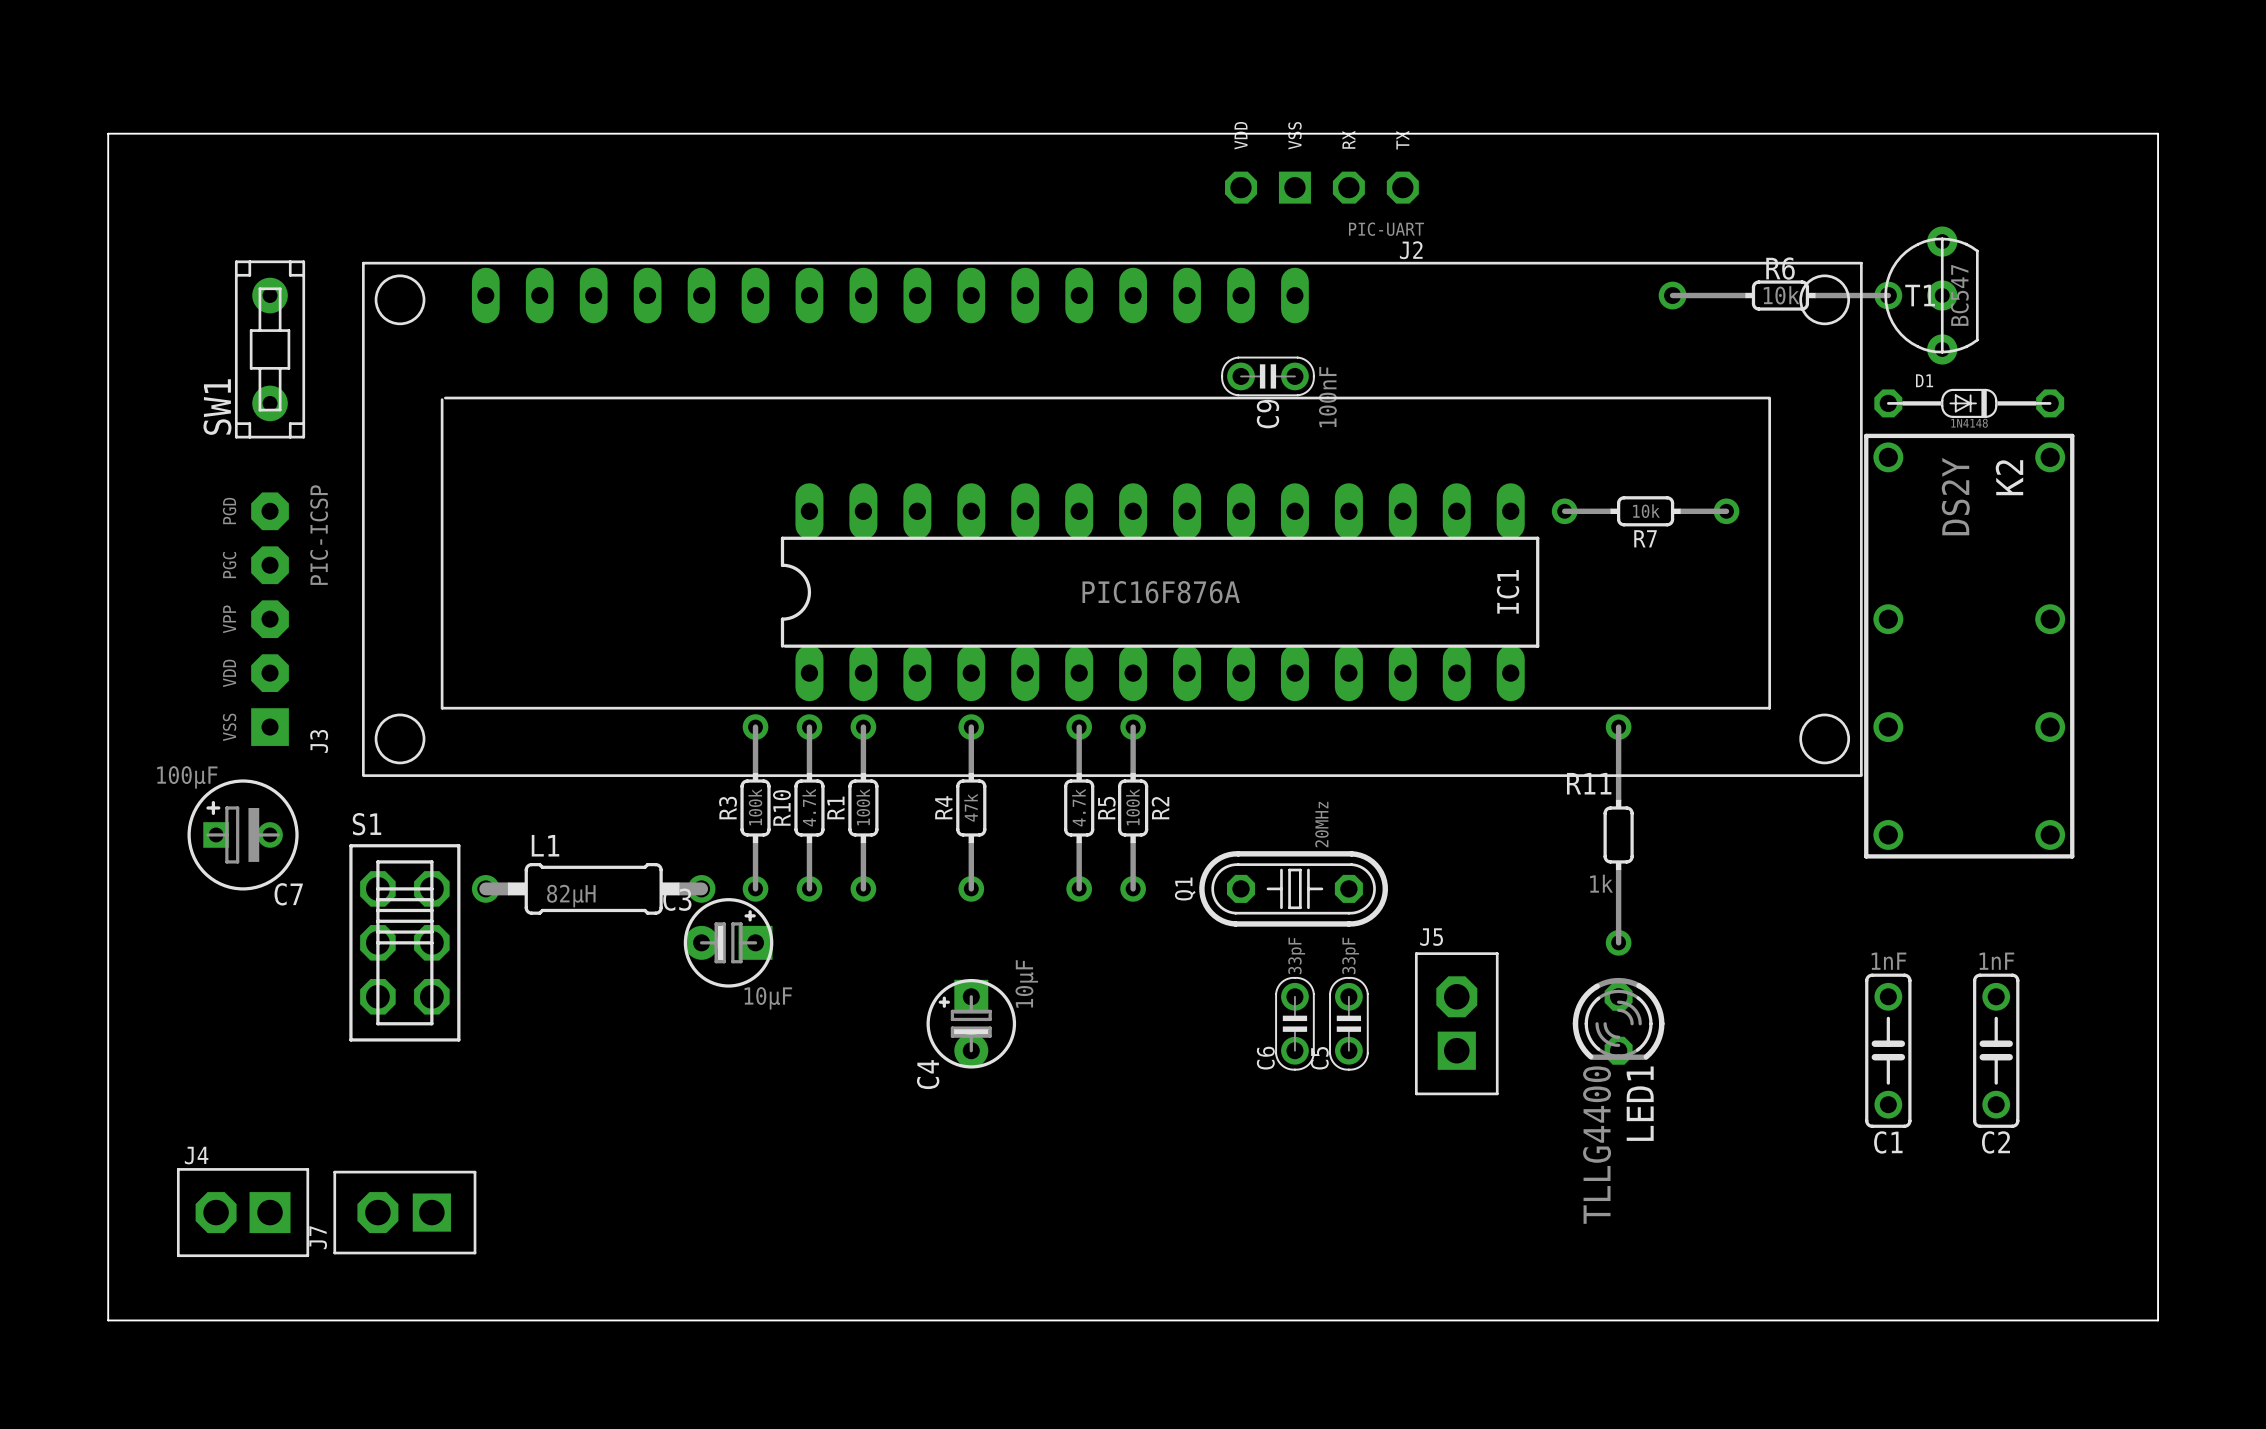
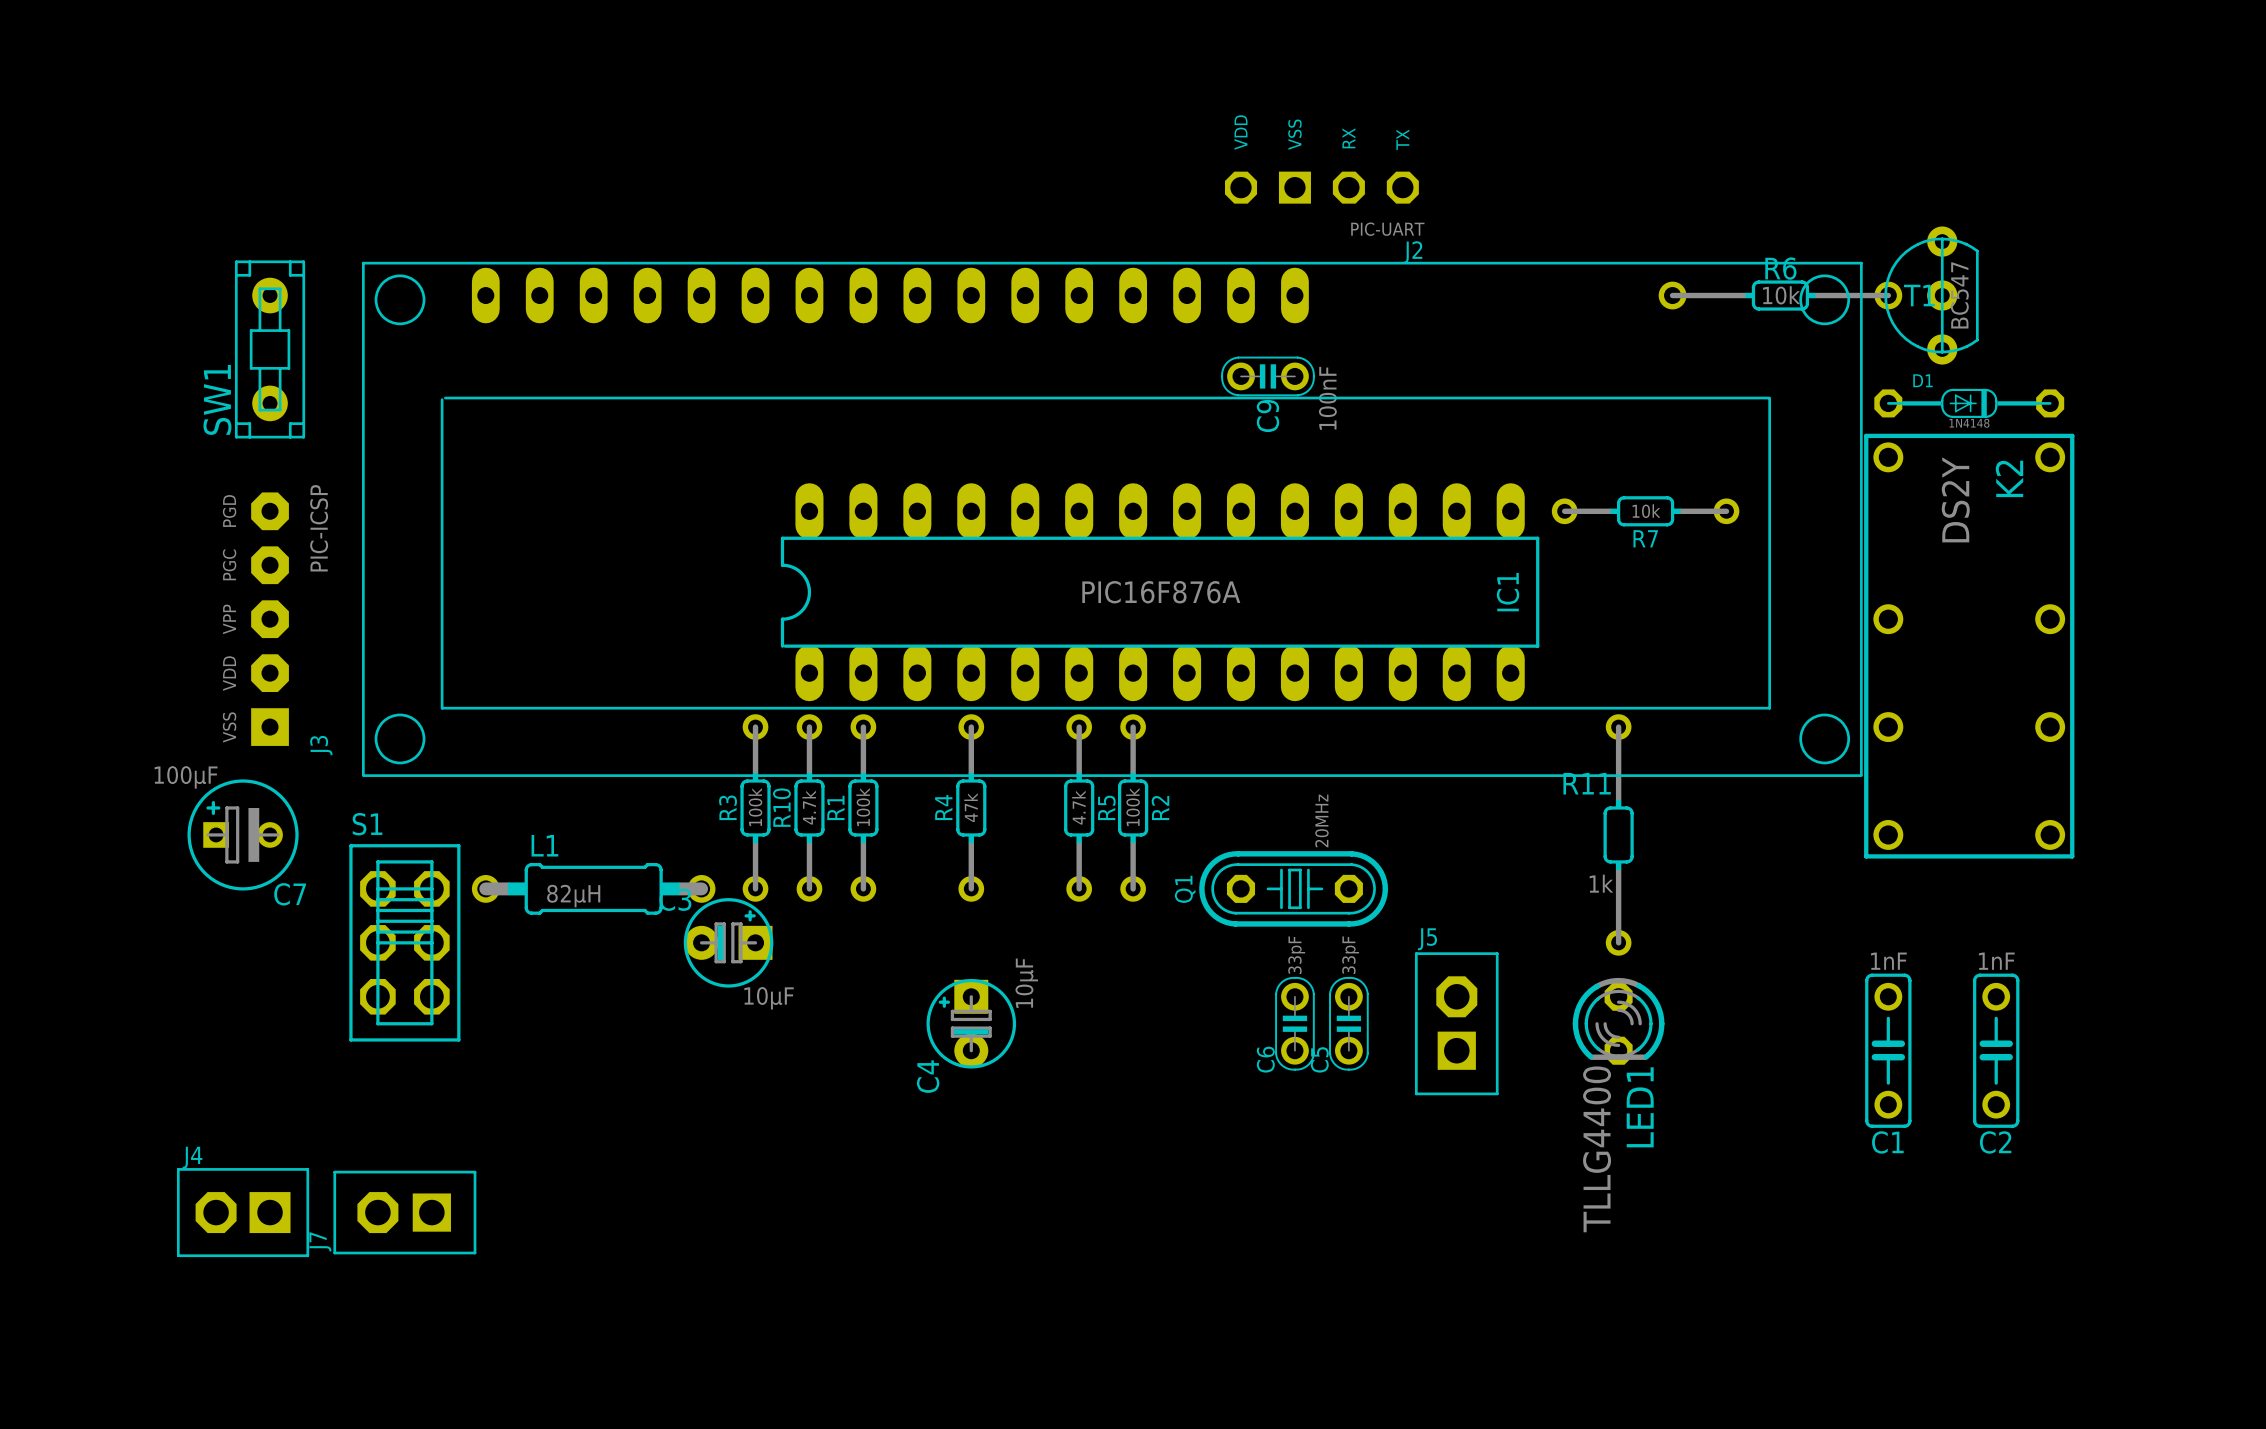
board edge: (108, 133) (108, 1320) (2158, 1320) (2158, 133) (108, 133) -> none

